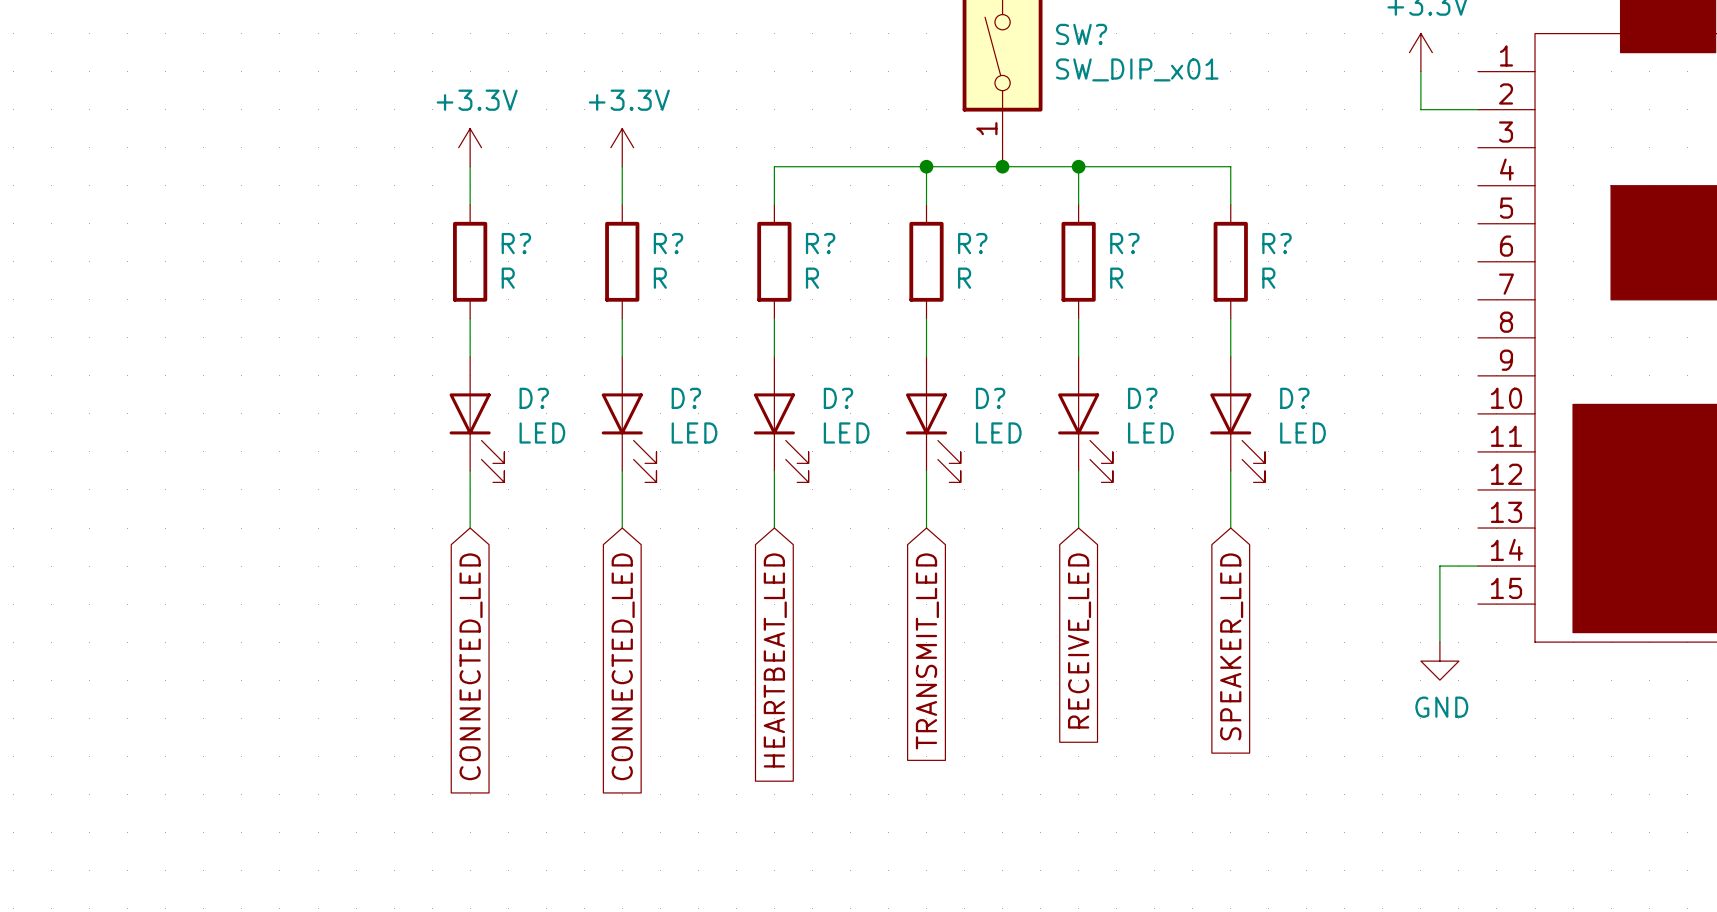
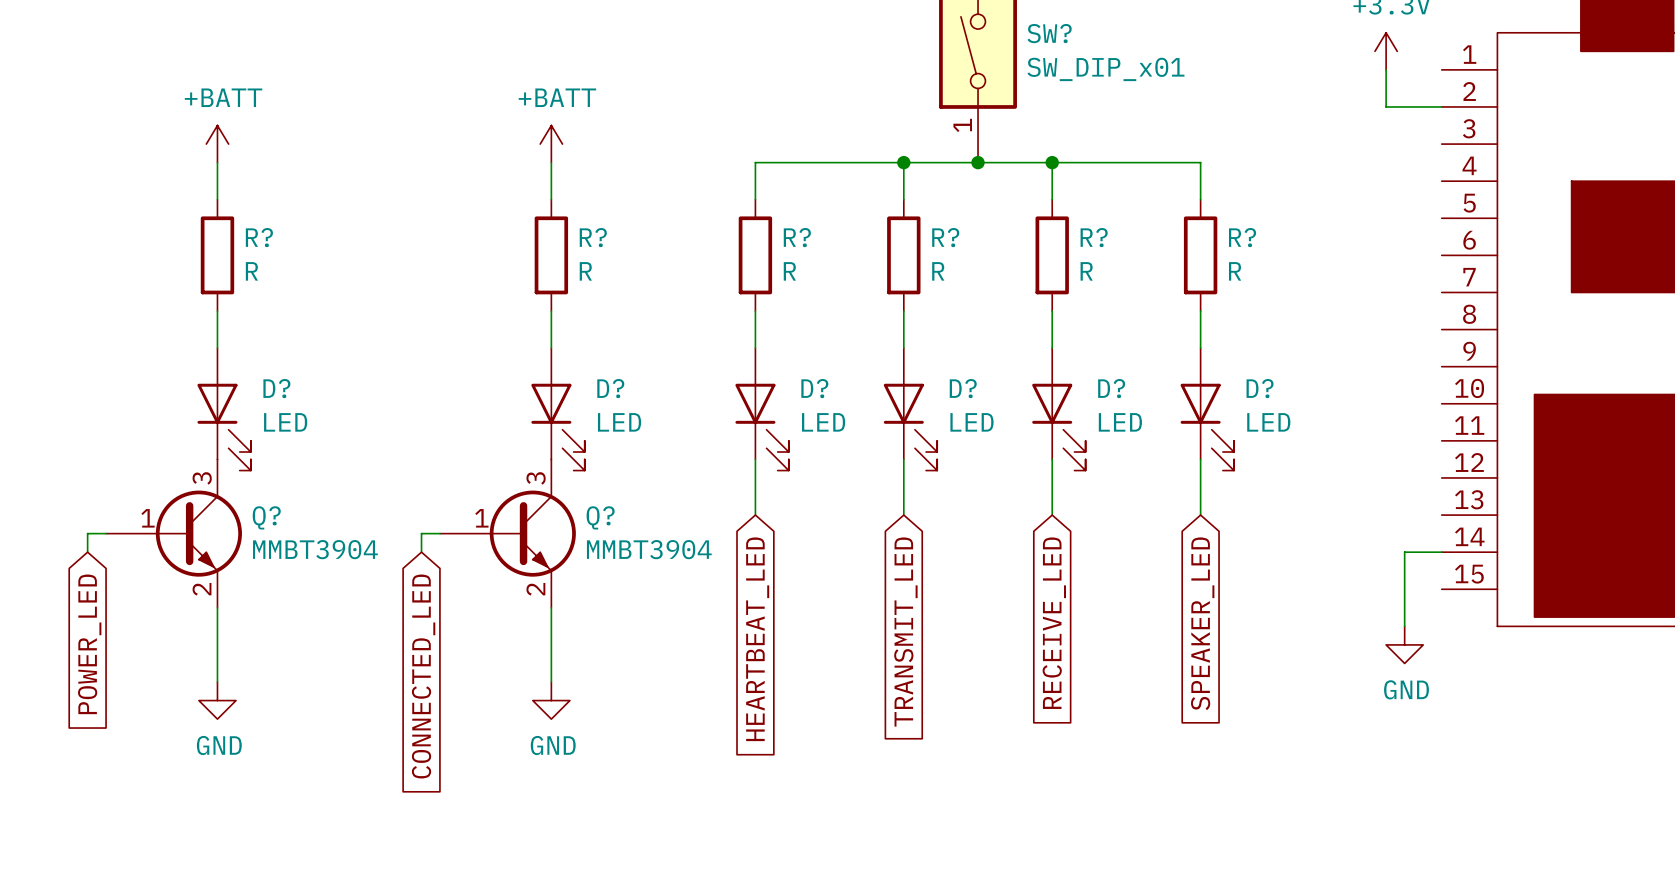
power symbol: none -> +BATT (217, 144)
power symbol: +3.3V (470, 147) -> none
power symbol: none -> +BATT (551, 144)
power symbol: +3.3V (622, 147) -> none
wire: (470, 166) (470, 204) -> (217, 162) (217, 199)
wire: (622, 166) (622, 204) -> (551, 162) (551, 199)
R?: none -> R (217, 255)
R?: R (470, 261) -> none
R?: none -> R (551, 255)
R?: R (622, 261) -> none
wire: (470, 318) (470, 356) -> (217, 311) (217, 348)
wire: (622, 318) (622, 356) -> (551, 311) (551, 348)
D?: none -> LED (224, 409)
D?: LED (476, 419) -> none
D?: none -> LED (558, 409)
D?: LED (629, 419) -> none
wire: (470, 470) (470, 528) -> none
wire: (622, 470) (622, 528) -> none
wire: none -> (106, 533) (87, 533) (87, 552)
Q?: none -> MMBT3904 (174, 533)
wire: none -> (440, 533) (421, 533) (421, 552)
Q?: none -> MMBT3904 (507, 533)
wire: none -> (217, 607) (217, 682)
wire: none -> (551, 607) (551, 682)
global label position: CONNECTED_LED (471, 666) -> CONNECTED_LED (423, 676)
global label: CONNECTED_LED (623, 666) -> none
global label: none -> POWER_LED (89, 644)
power symbol: none -> GND (217, 700)
power symbol: none -> GND (551, 700)

